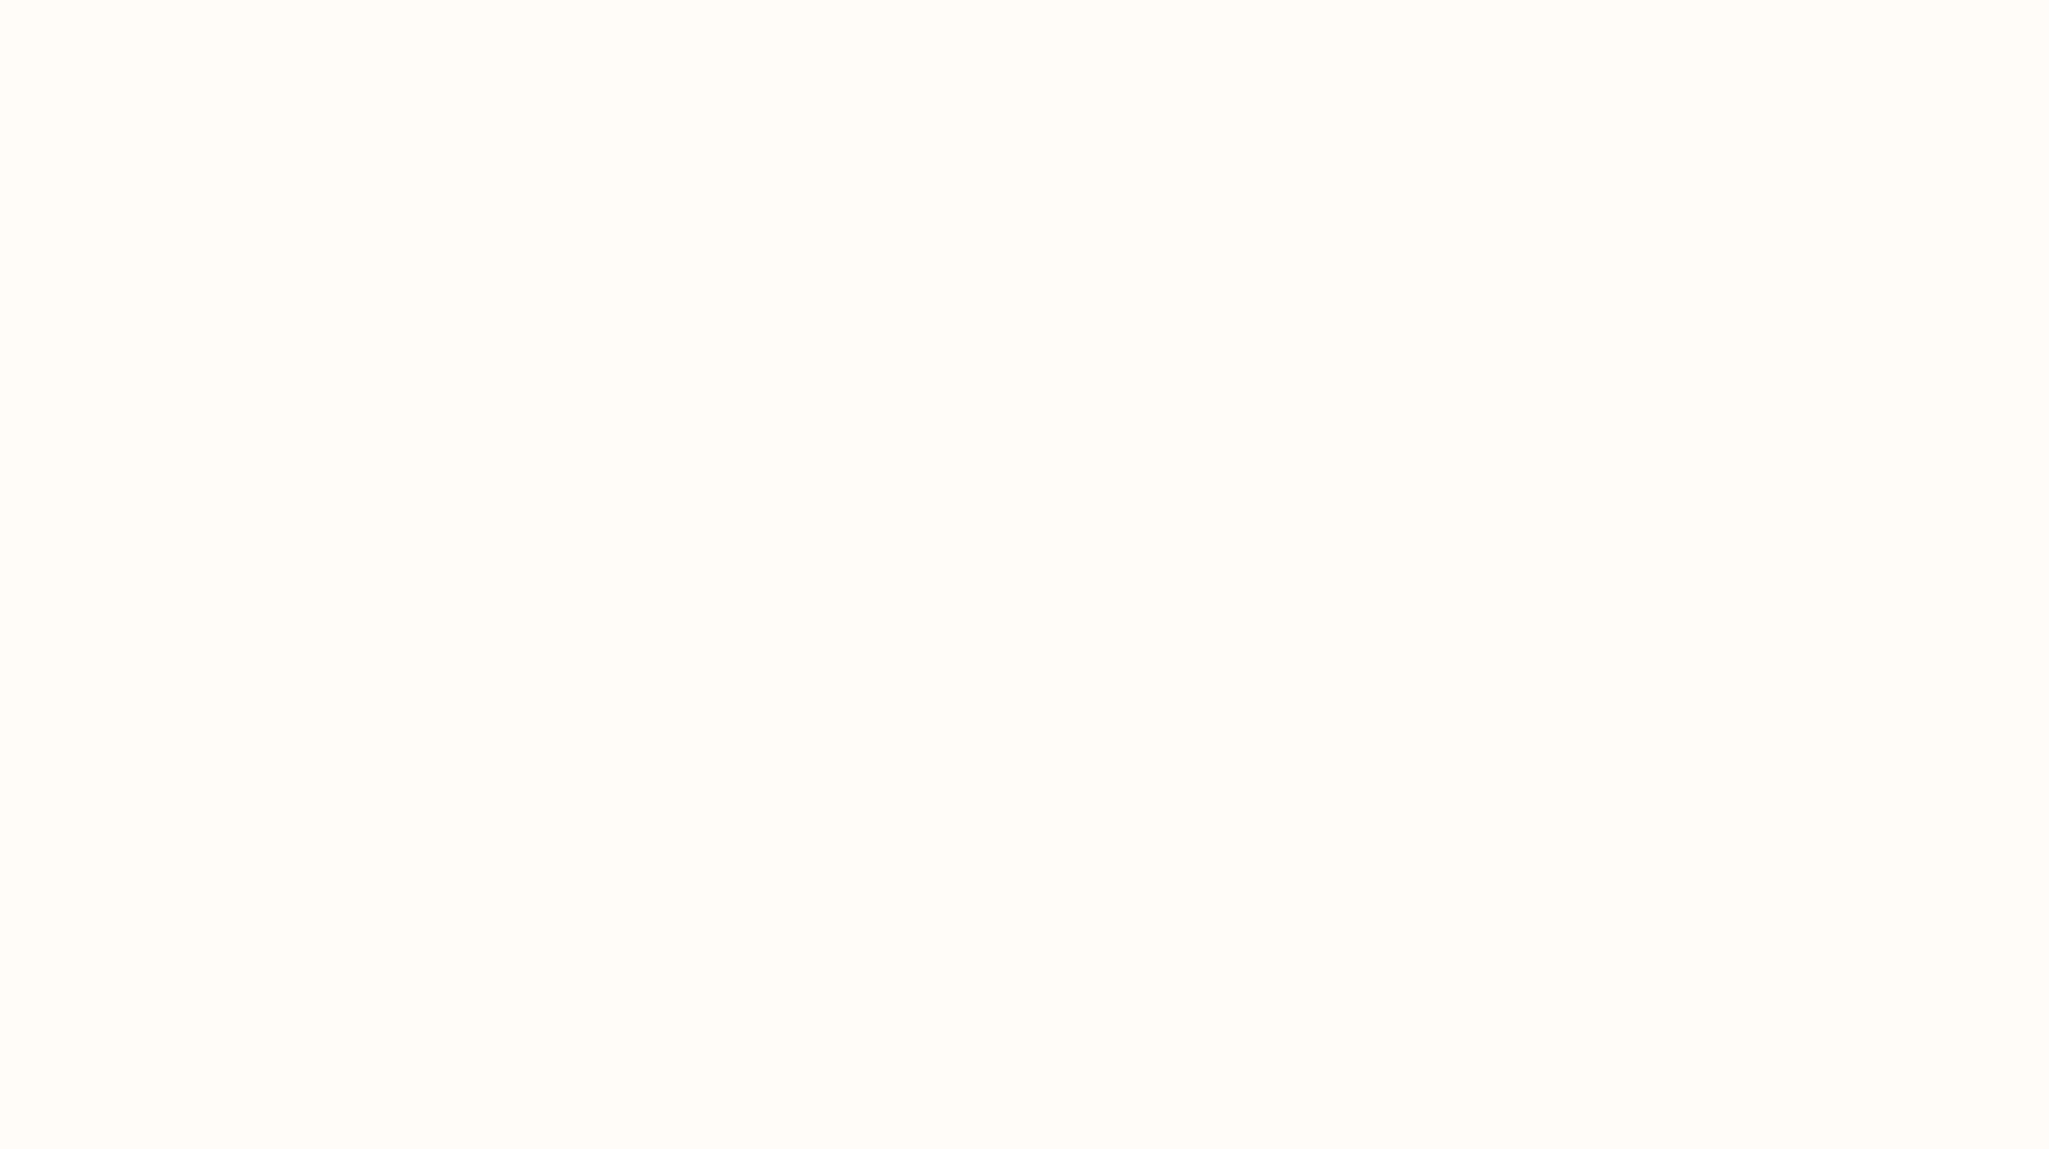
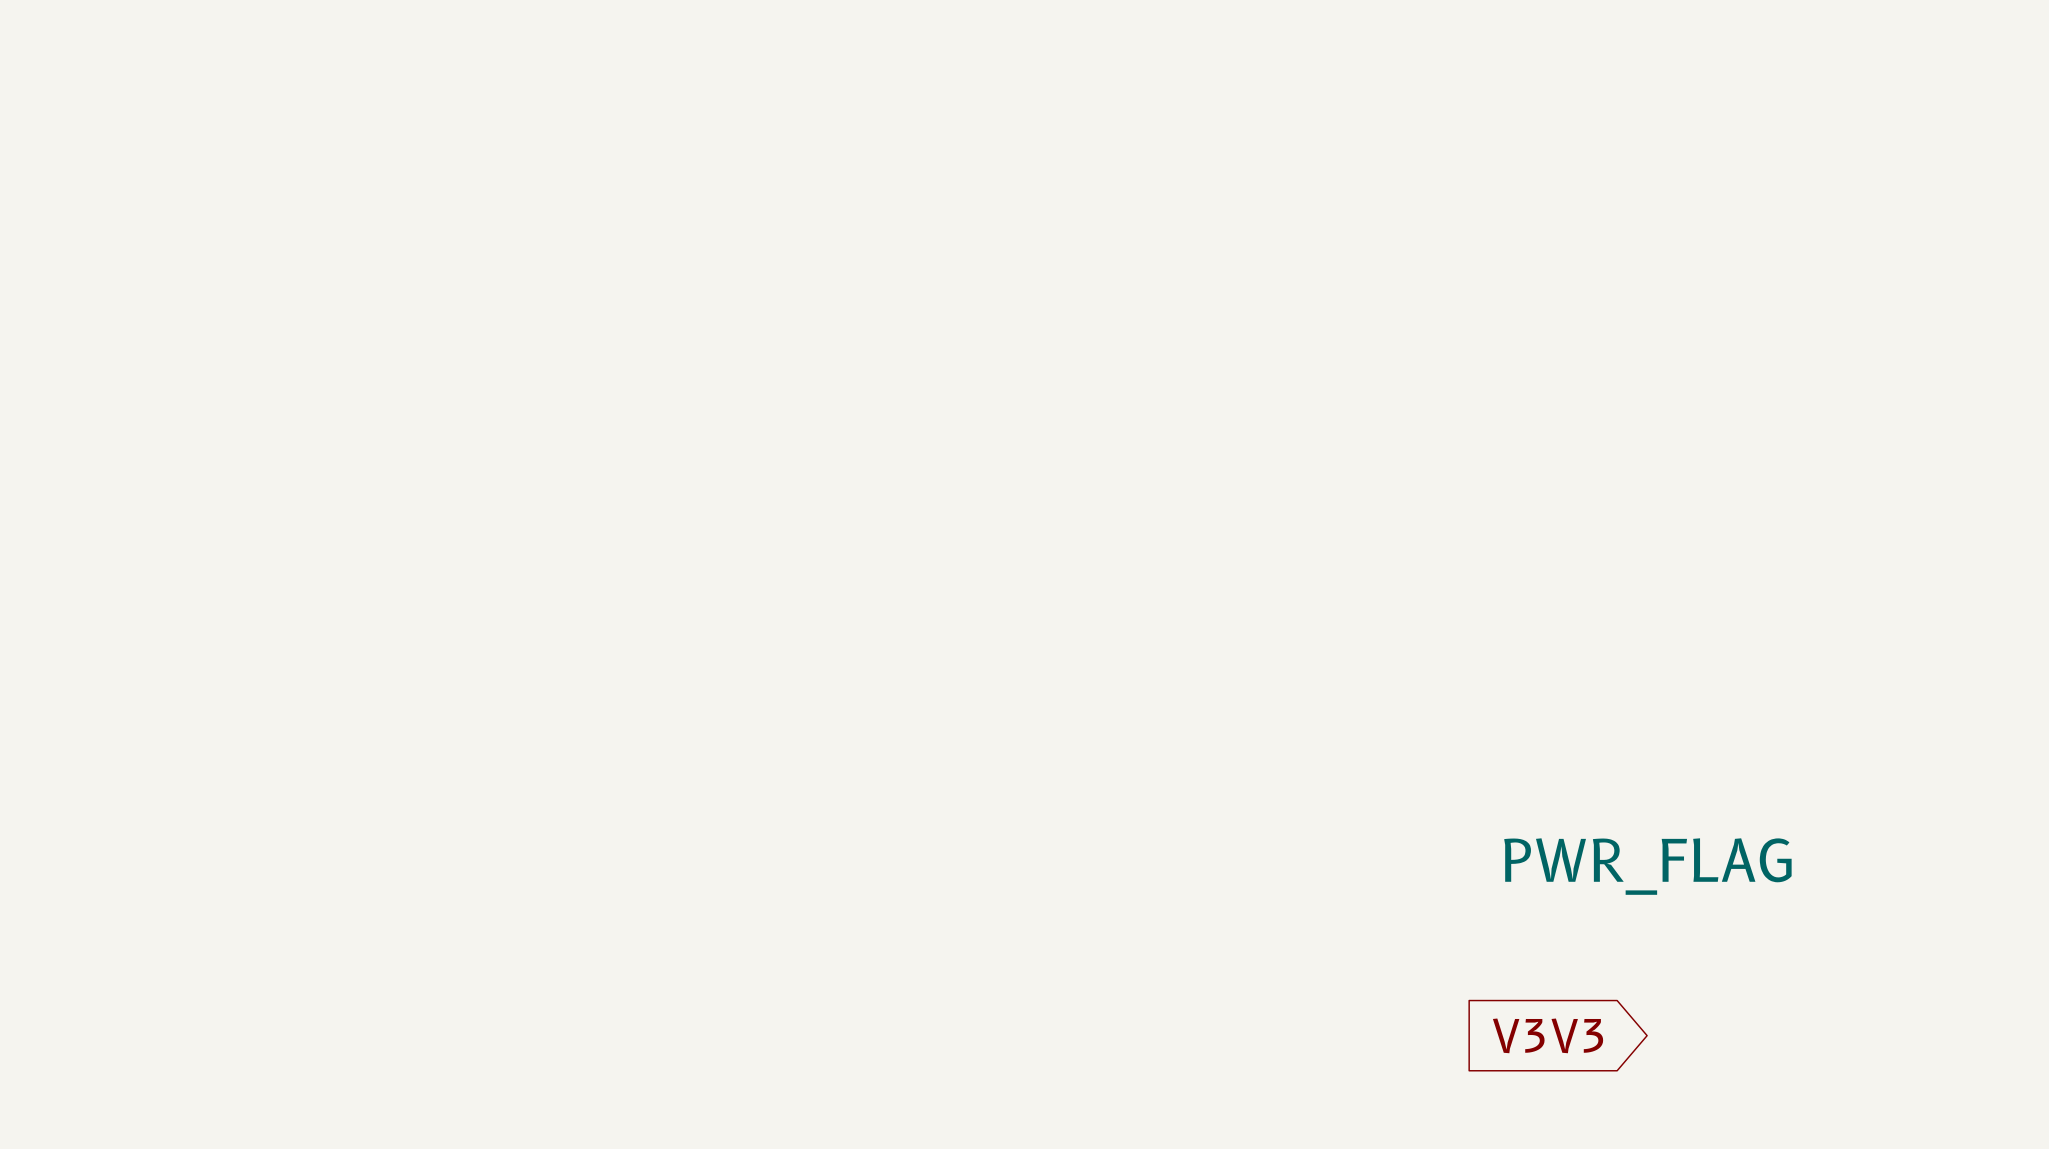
power symbol: none -> PWR_FLAG (1647, 866)
global label: none -> V3V3 (1548, 1035)

